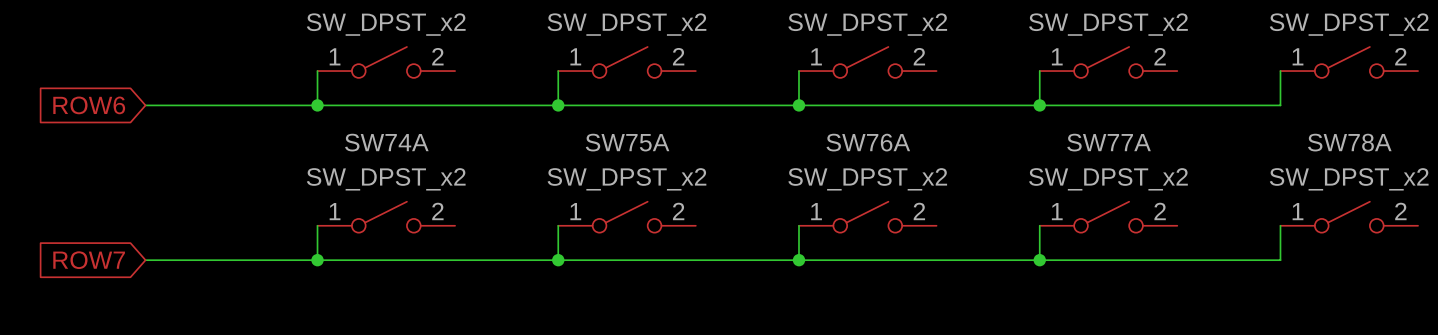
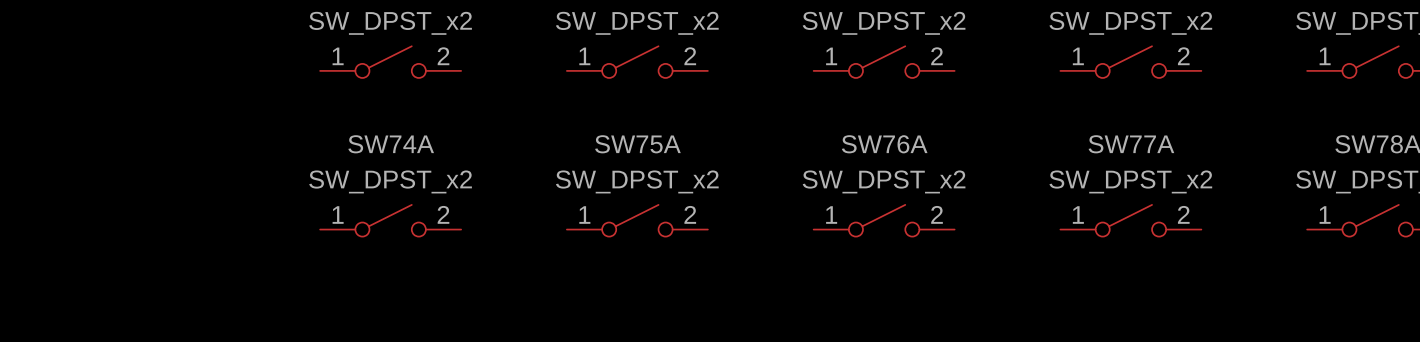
wire: (317, 71) (317, 105) -> none
wire: (558, 71) (558, 105) -> none
wire: (799, 71) (799, 105) -> none
wire: (1039, 71) (1039, 105) -> none
wire: (1280, 71) (1280, 105) (145, 105) -> none
global label: ROW6 (89, 105) -> none
junction: (317, 105) -> none
junction: (558, 105) -> none
junction: (799, 105) -> none
junction: (1039, 105) -> none
wire: (317, 225) (317, 260) -> none
wire: (558, 225) (558, 260) -> none
wire: (799, 225) (799, 260) -> none
wire: (1039, 225) (1039, 260) -> none
wire: (1280, 225) (1280, 260) (145, 260) -> none
global label: ROW7 (89, 260) -> none
junction: (317, 260) -> none
junction: (558, 260) -> none
junction: (799, 260) -> none
junction: (1039, 260) -> none

